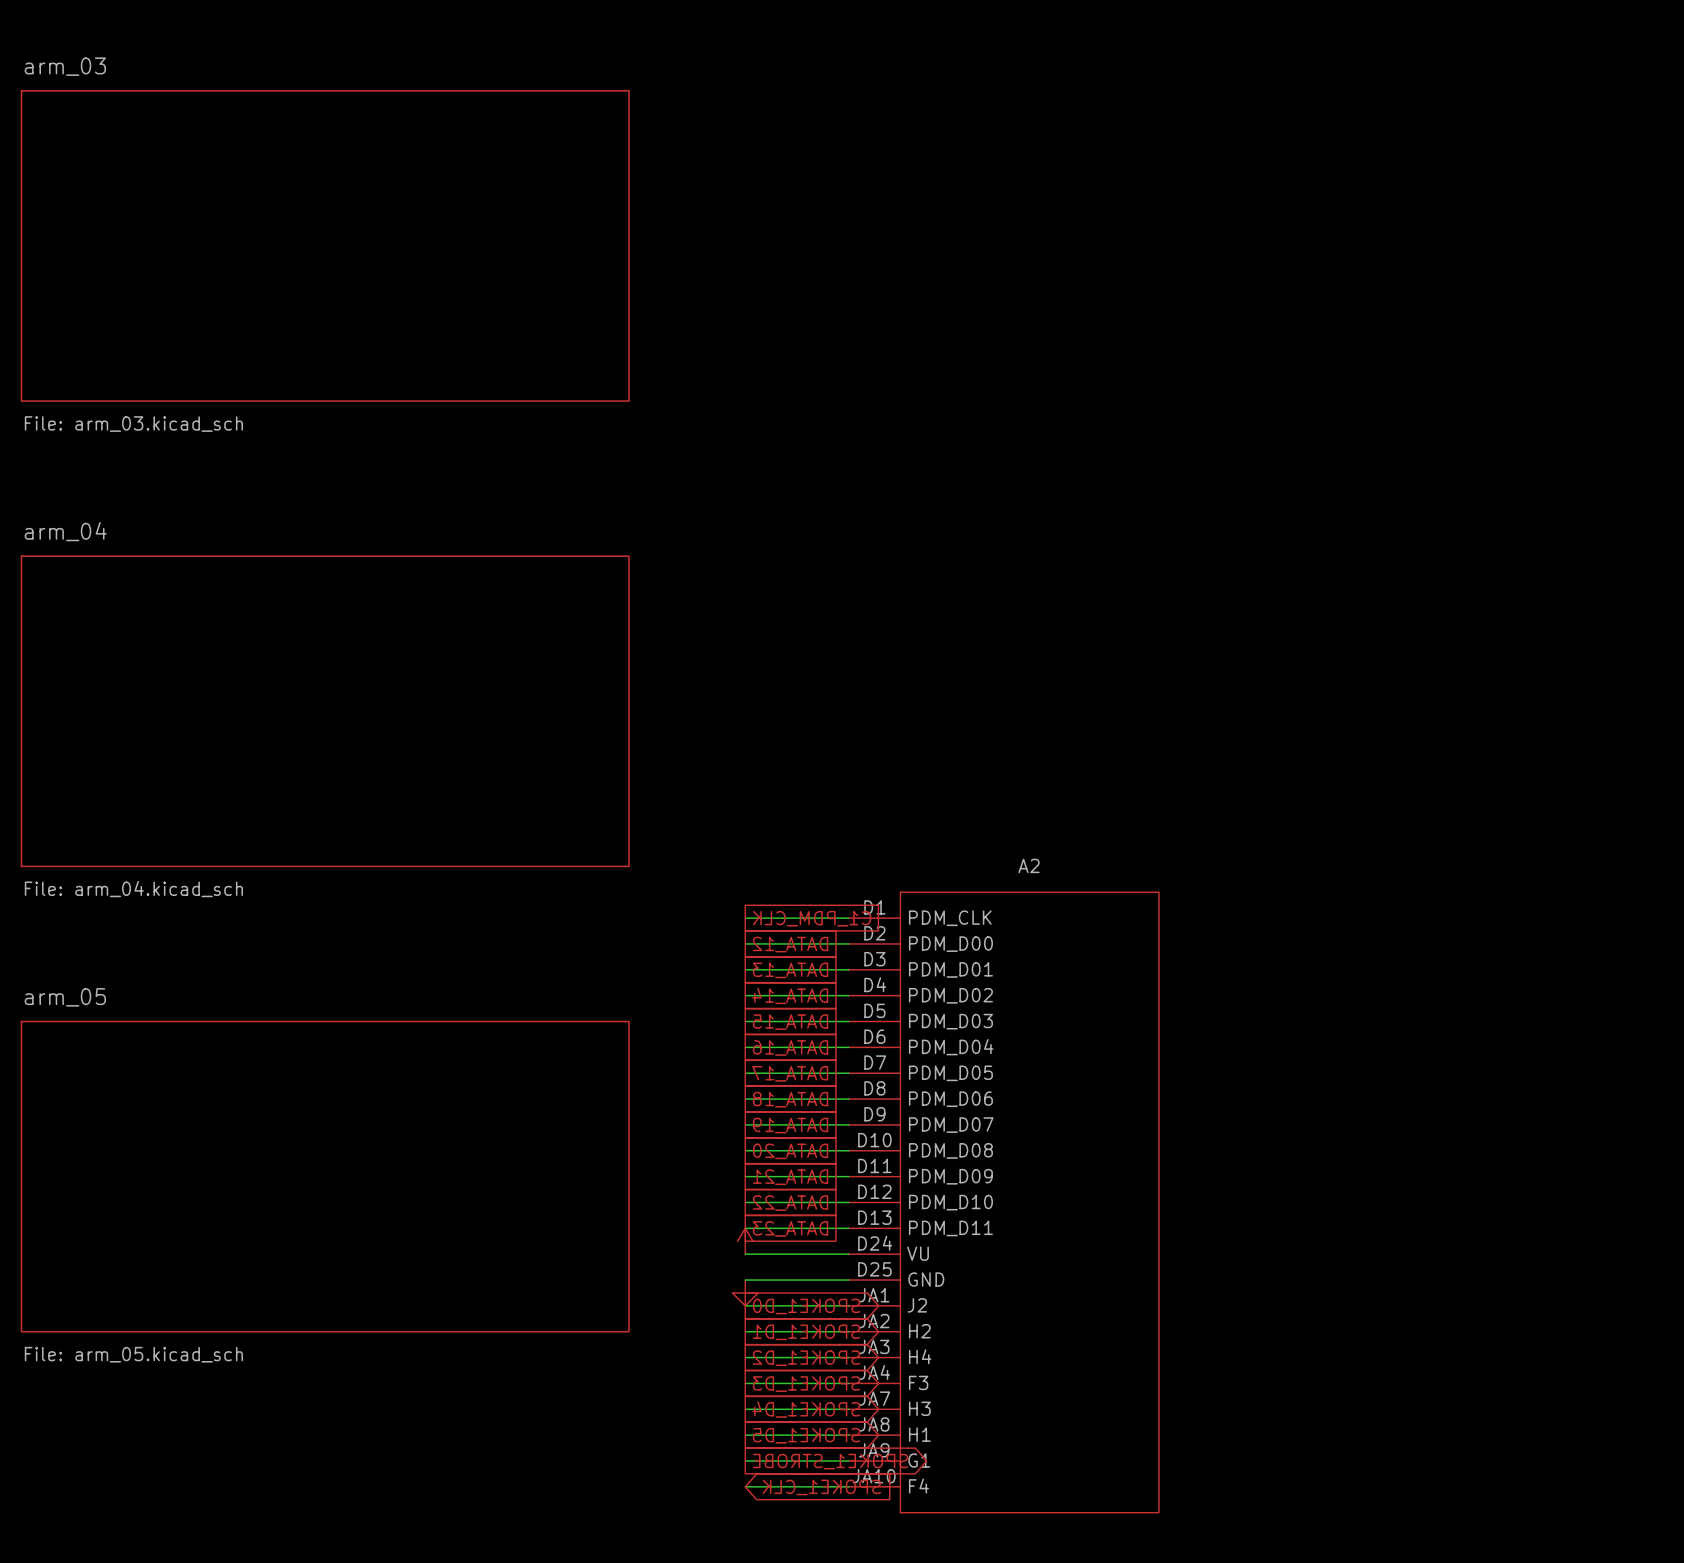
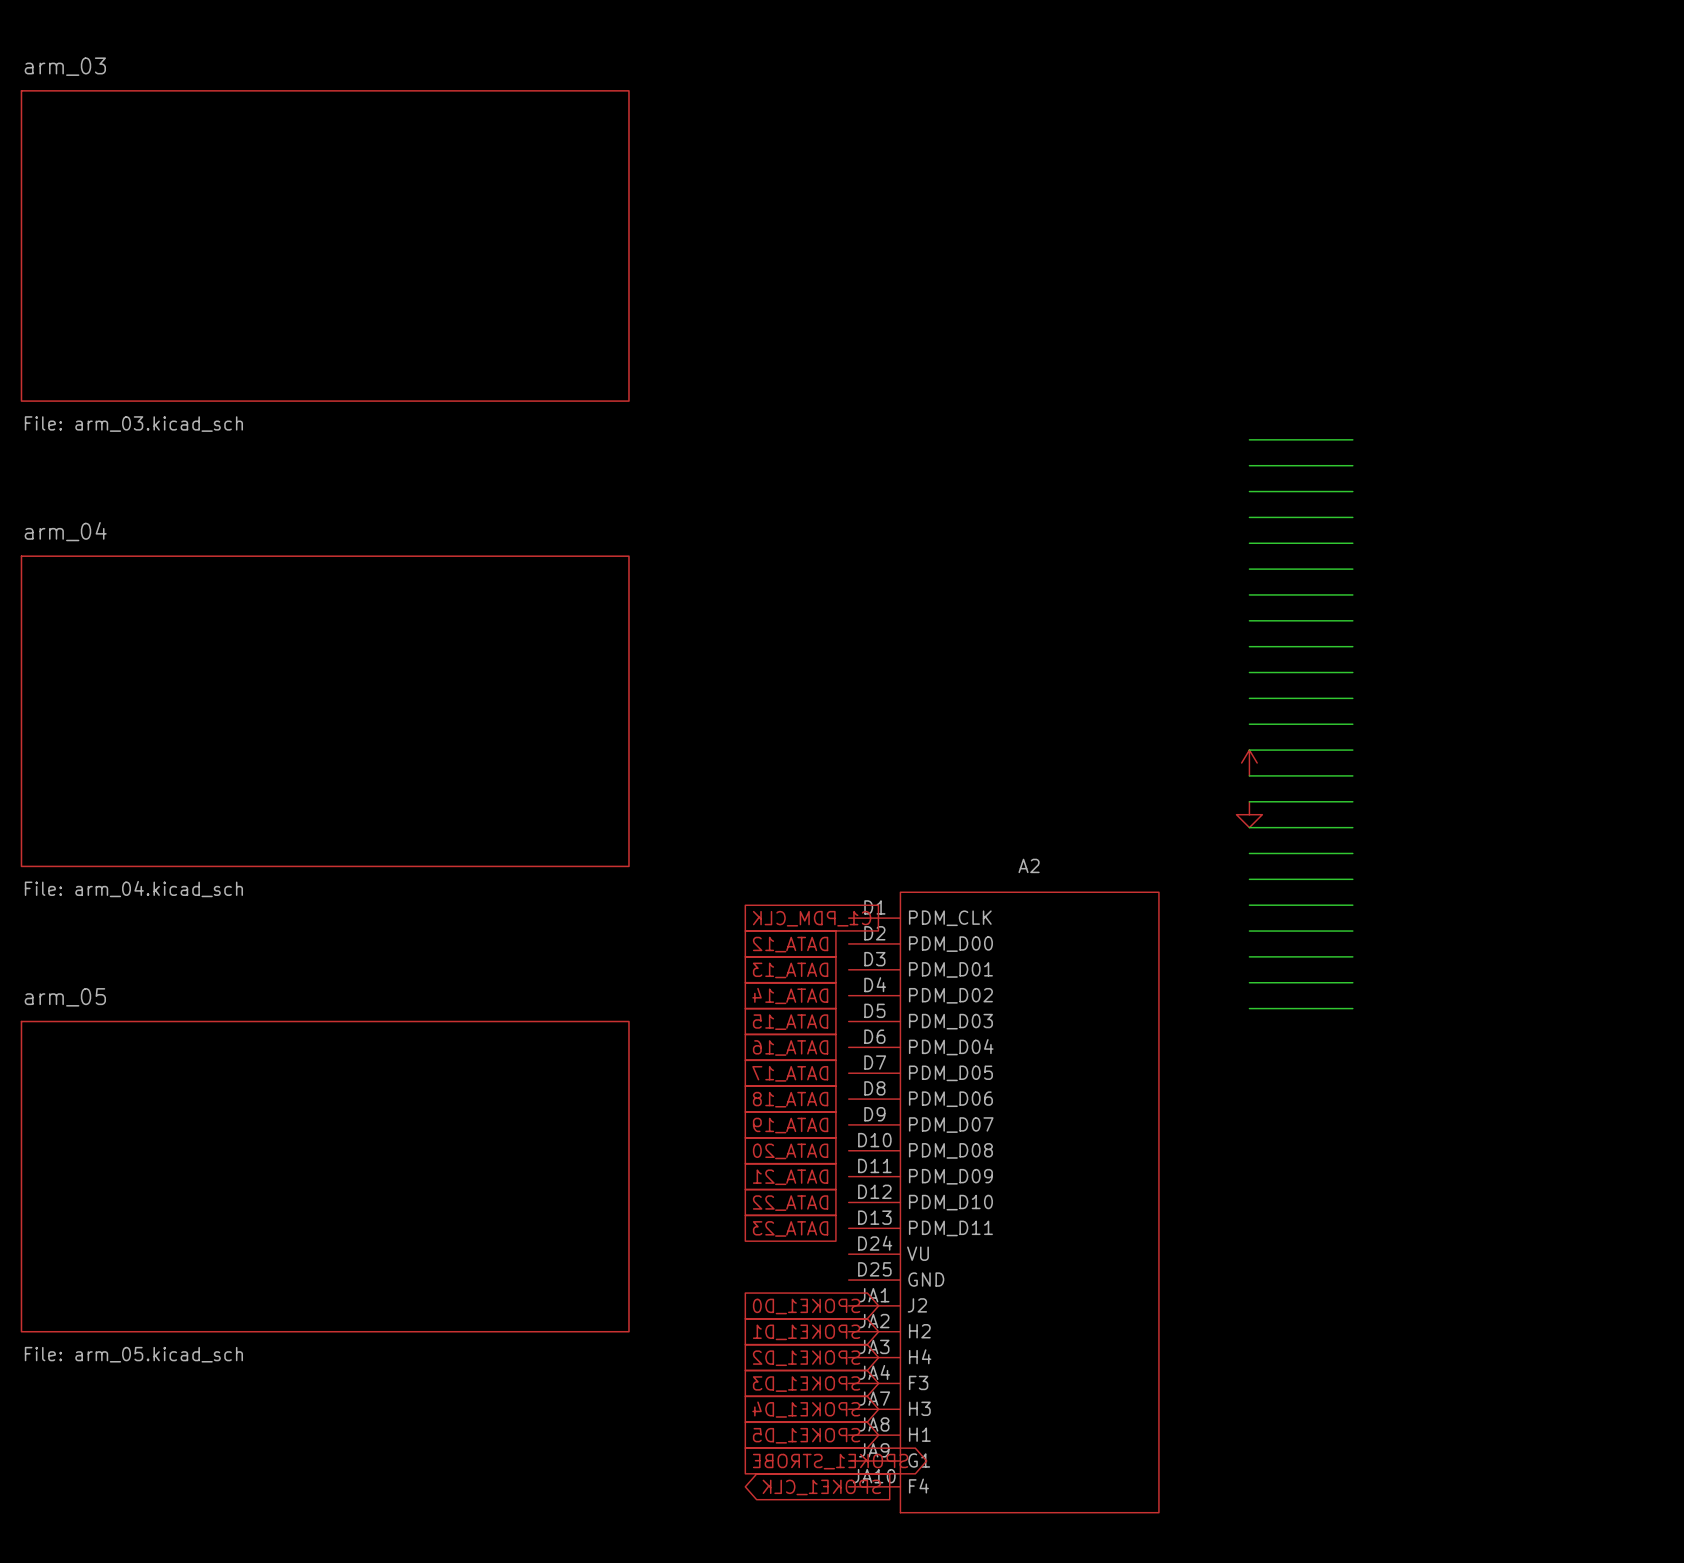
wire: none -> (1249, 439) (1352, 439)
wire: none -> (1249, 465) (1352, 465)
wire: none -> (1249, 491) (1352, 491)
wire: none -> (1249, 517) (1352, 517)
wire: none -> (1249, 543) (1352, 543)
wire: none -> (1249, 569) (1352, 569)
wire: none -> (1249, 594) (1352, 594)
wire: none -> (1249, 620) (1352, 620)
wire: none -> (1249, 646) (1352, 646)
wire: none -> (1249, 672) (1352, 672)
wire: none -> (1249, 698) (1352, 698)
wire: none -> (1249, 724) (1352, 724)
wire: none -> (1249, 750) (1352, 750)
power symbol: none -> (1249, 763)
wire: none -> (1249, 775) (1352, 775)
wire: none -> (1249, 801) (1352, 801)
power symbol: none -> (1249, 814)
wire: none -> (1249, 827) (1352, 827)
wire: none -> (1249, 853) (1352, 853)
wire: none -> (1249, 879) (1352, 879)
wire: none -> (1249, 905) (1352, 905)
wire: (745, 918) (848, 918) -> none
wire: none -> (1249, 931) (1352, 931)
wire: (745, 943) (848, 943) -> none
wire: none -> (1249, 956) (1352, 956)
wire: (745, 969) (848, 969) -> none
wire: none -> (1249, 982) (1352, 982)
wire: (745, 995) (848, 995) -> none
wire: none -> (1249, 1008) (1352, 1008)
wire: (745, 1021) (848, 1021) -> none
wire: (745, 1047) (848, 1047) -> none
wire: (745, 1073) (848, 1073) -> none
wire: (745, 1099) (848, 1099) -> none
wire: (745, 1124) (848, 1124) -> none
wire: (745, 1150) (848, 1150) -> none
wire: (745, 1176) (848, 1176) -> none
wire: (745, 1202) (848, 1202) -> none
wire: (745, 1228) (848, 1228) -> none
power symbol: (745, 1241) -> none
wire: (745, 1254) (848, 1254) -> none
wire: (745, 1280) (848, 1280) -> none
power symbol: (745, 1292) -> none
wire: (745, 1305) (848, 1305) -> none
wire: (745, 1331) (848, 1331) -> none
wire: (745, 1357) (848, 1357) -> none
wire: (745, 1383) (848, 1383) -> none
wire: (745, 1409) (848, 1409) -> none
wire: (745, 1435) (848, 1435) -> none
wire: (745, 1460) (848, 1460) -> none
wire: (745, 1486) (848, 1486) -> none

